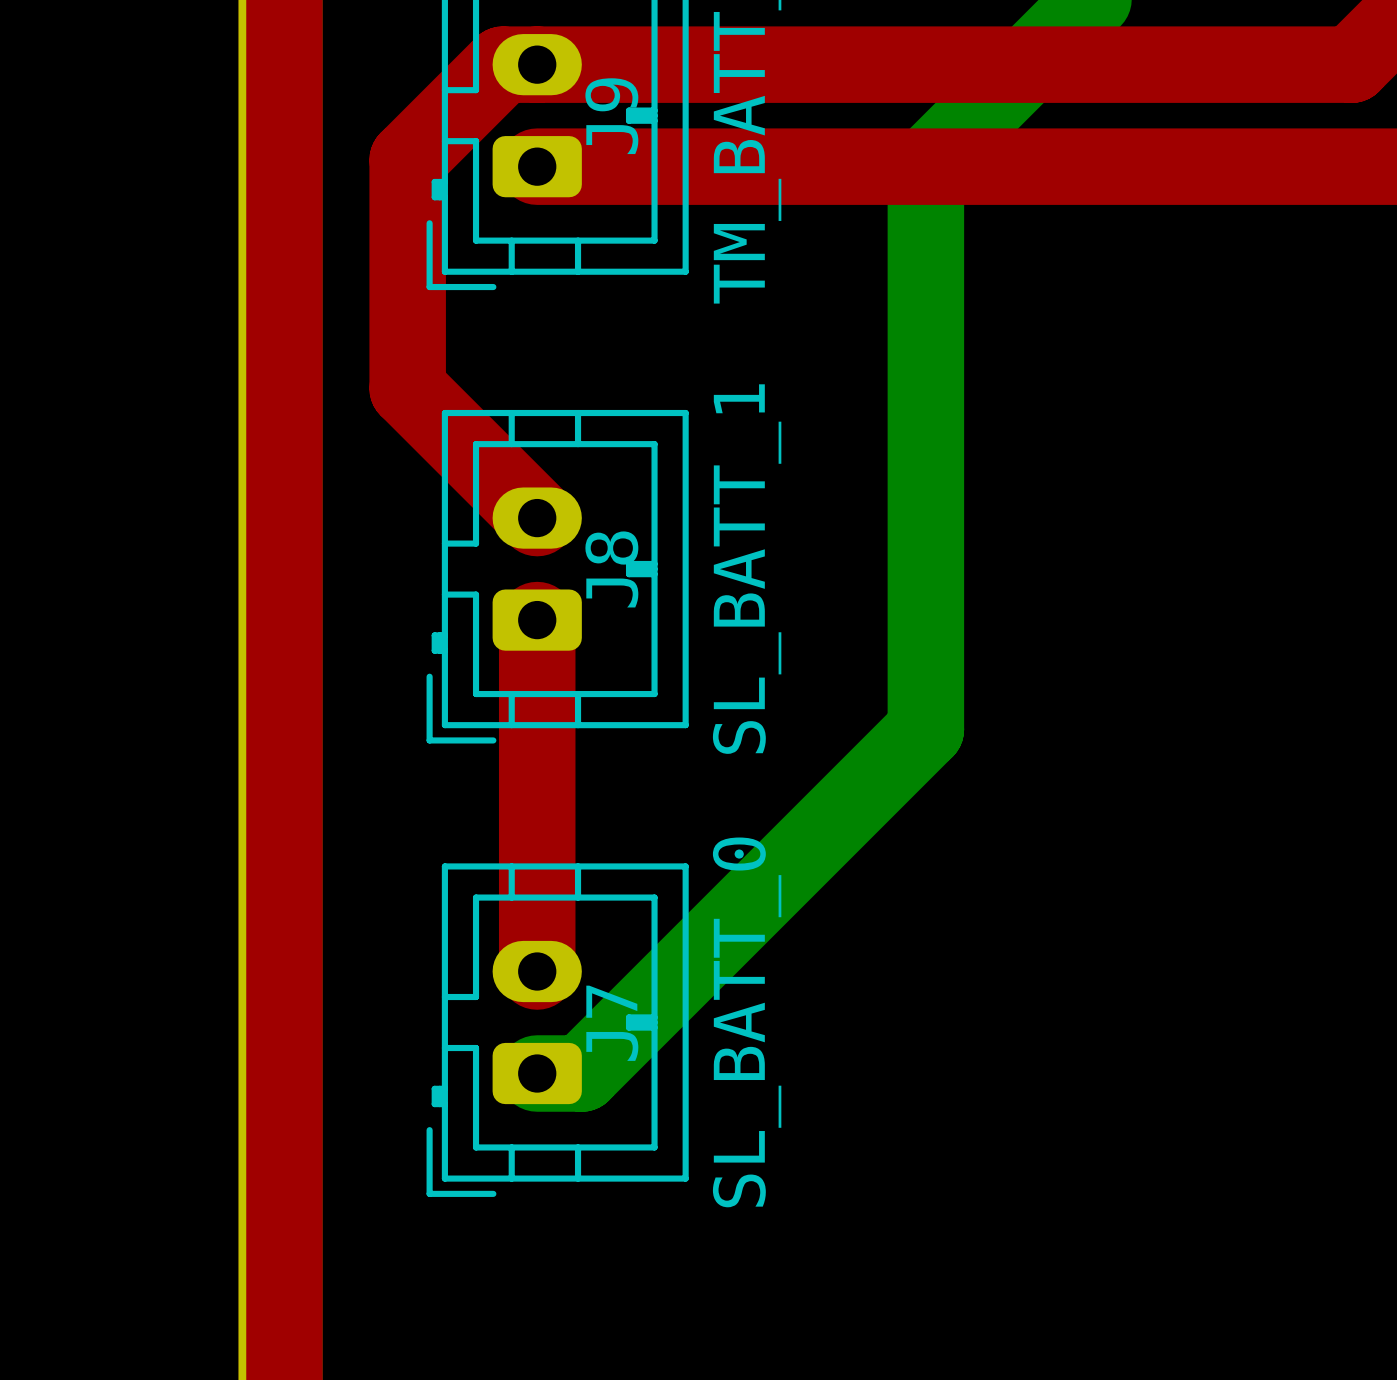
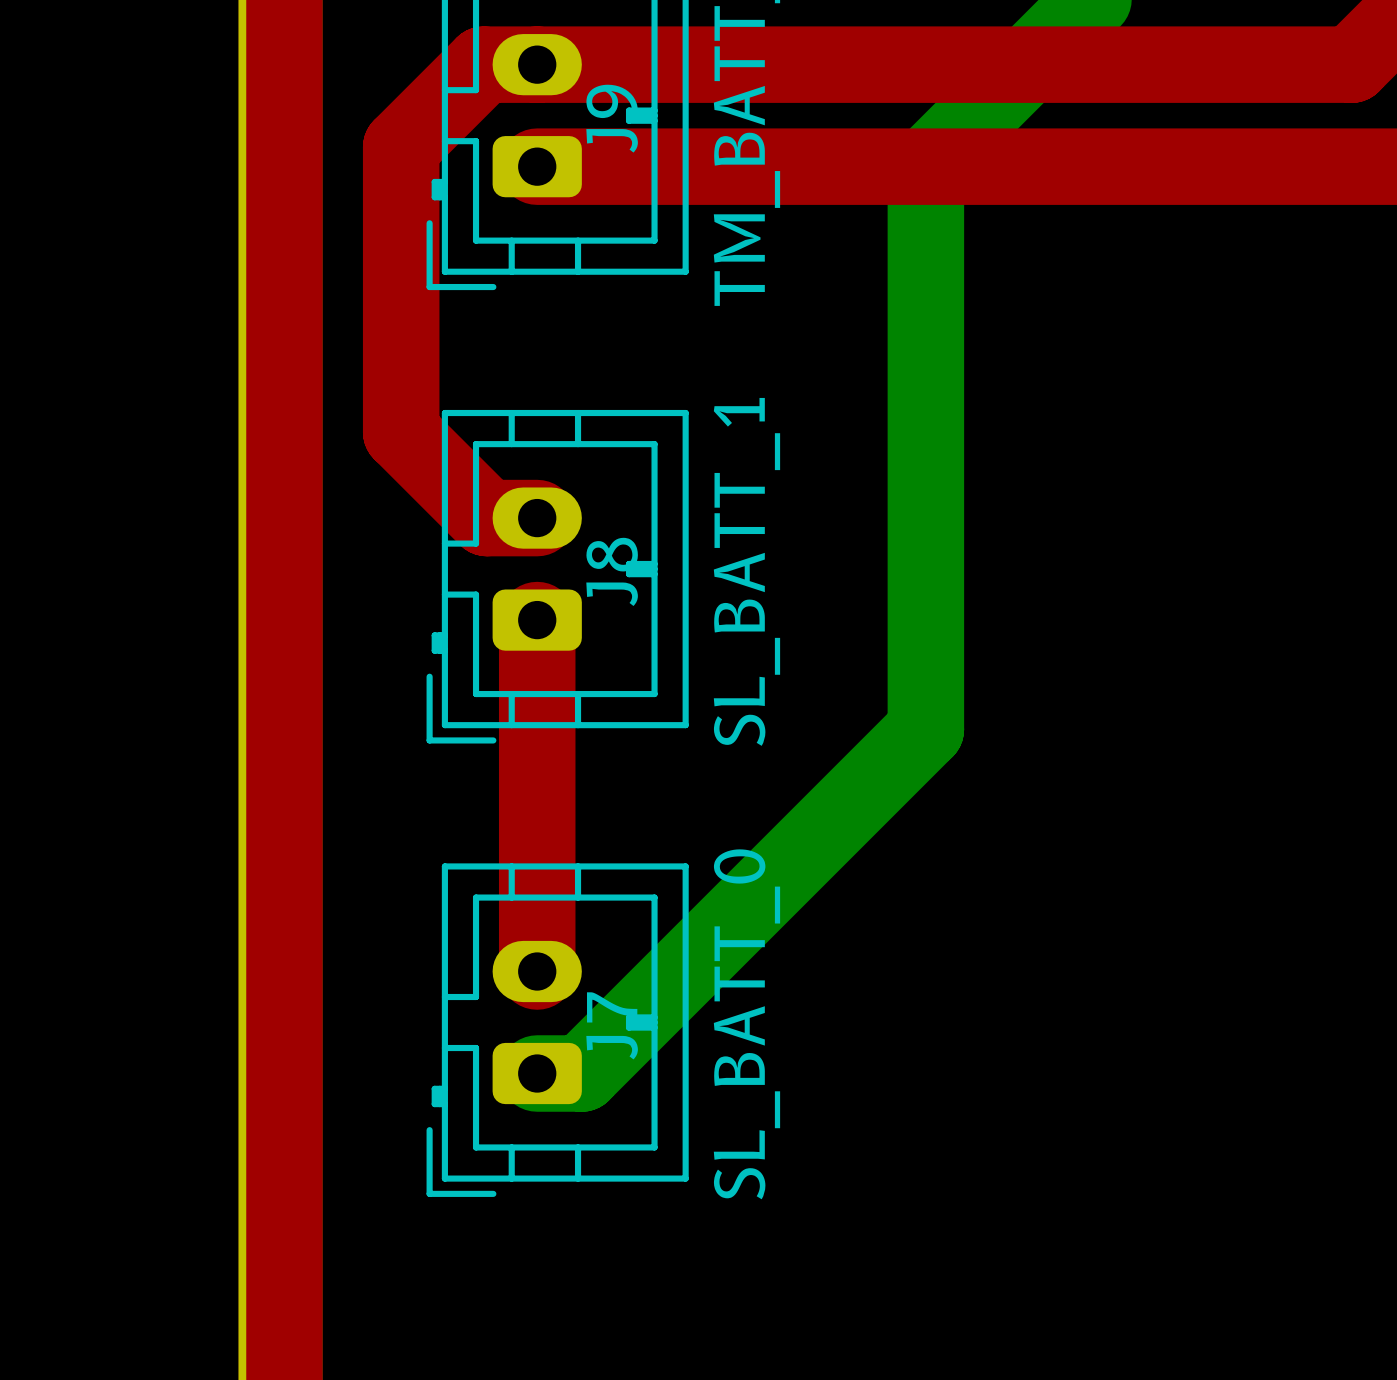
top track: (502, 64) (407, 159) (407, 388) (537, 518) -> (502, 64) (483, 64) (401, 147) (401, 432) (487, 518) (537, 518)

